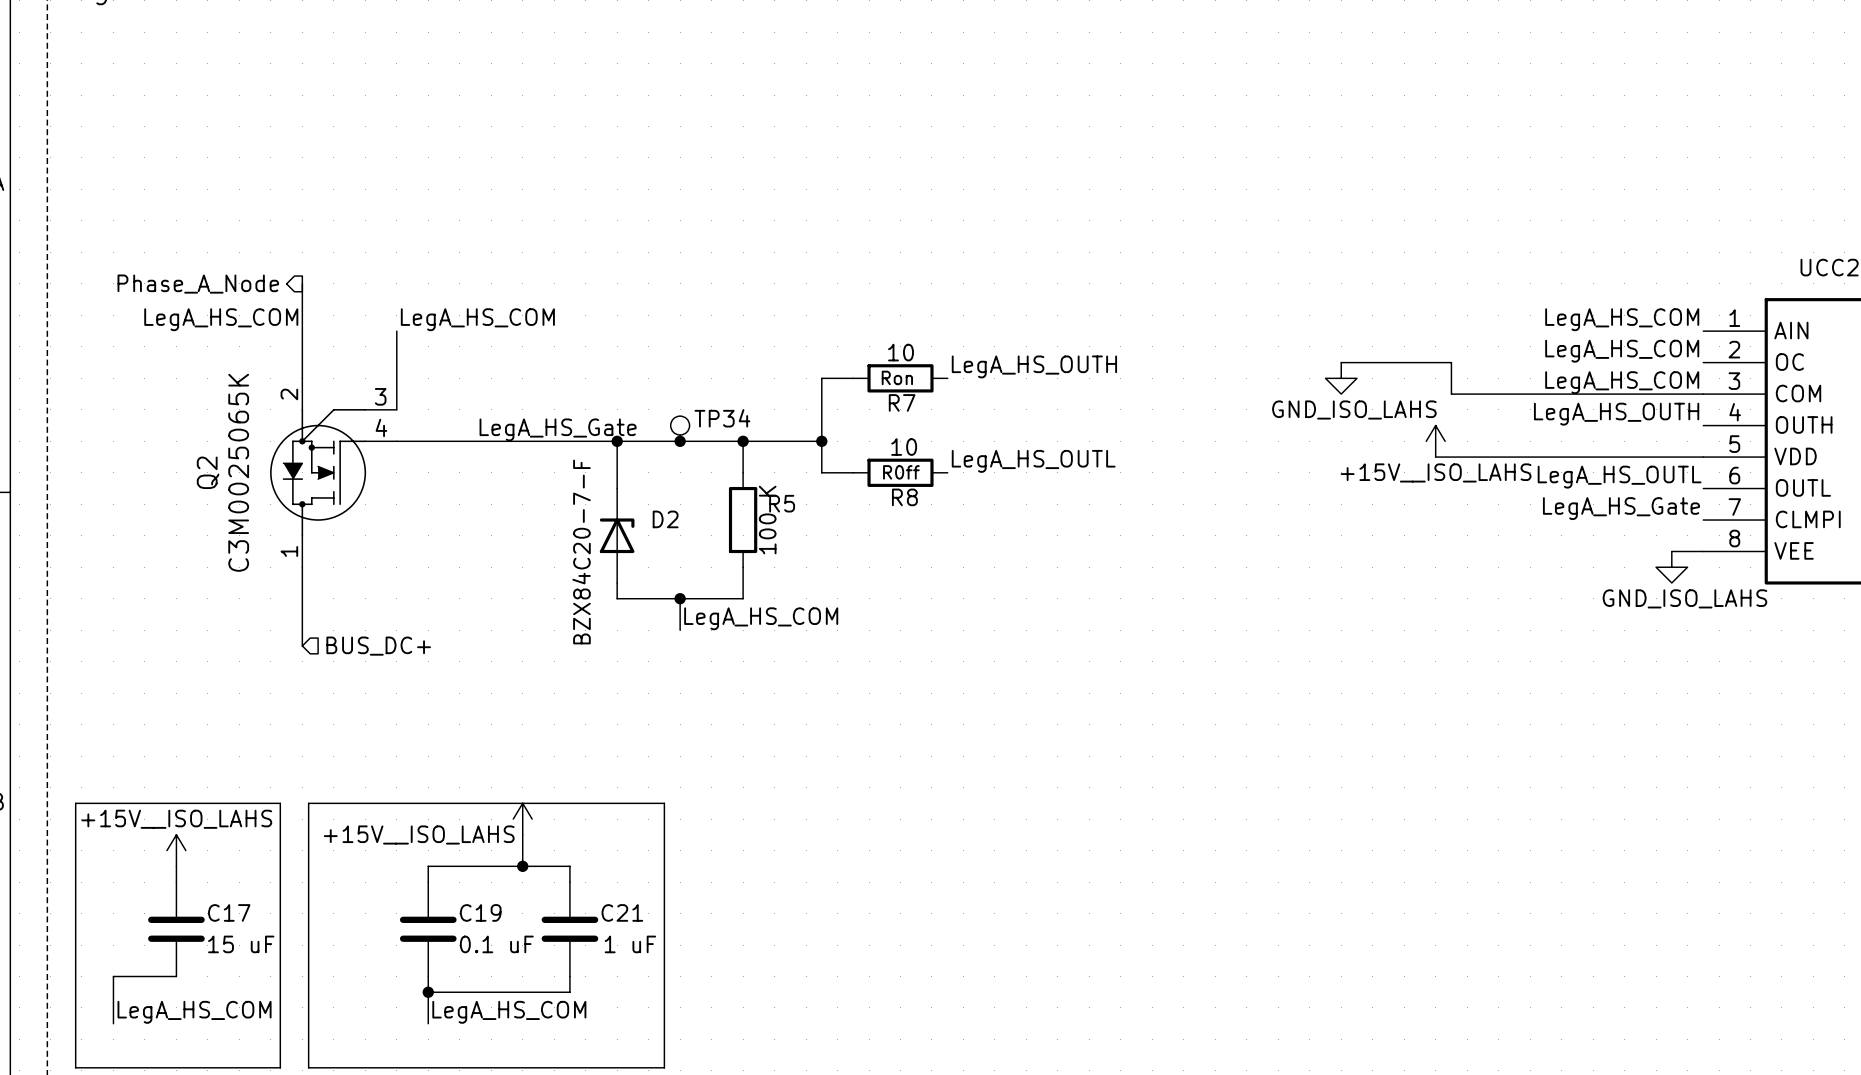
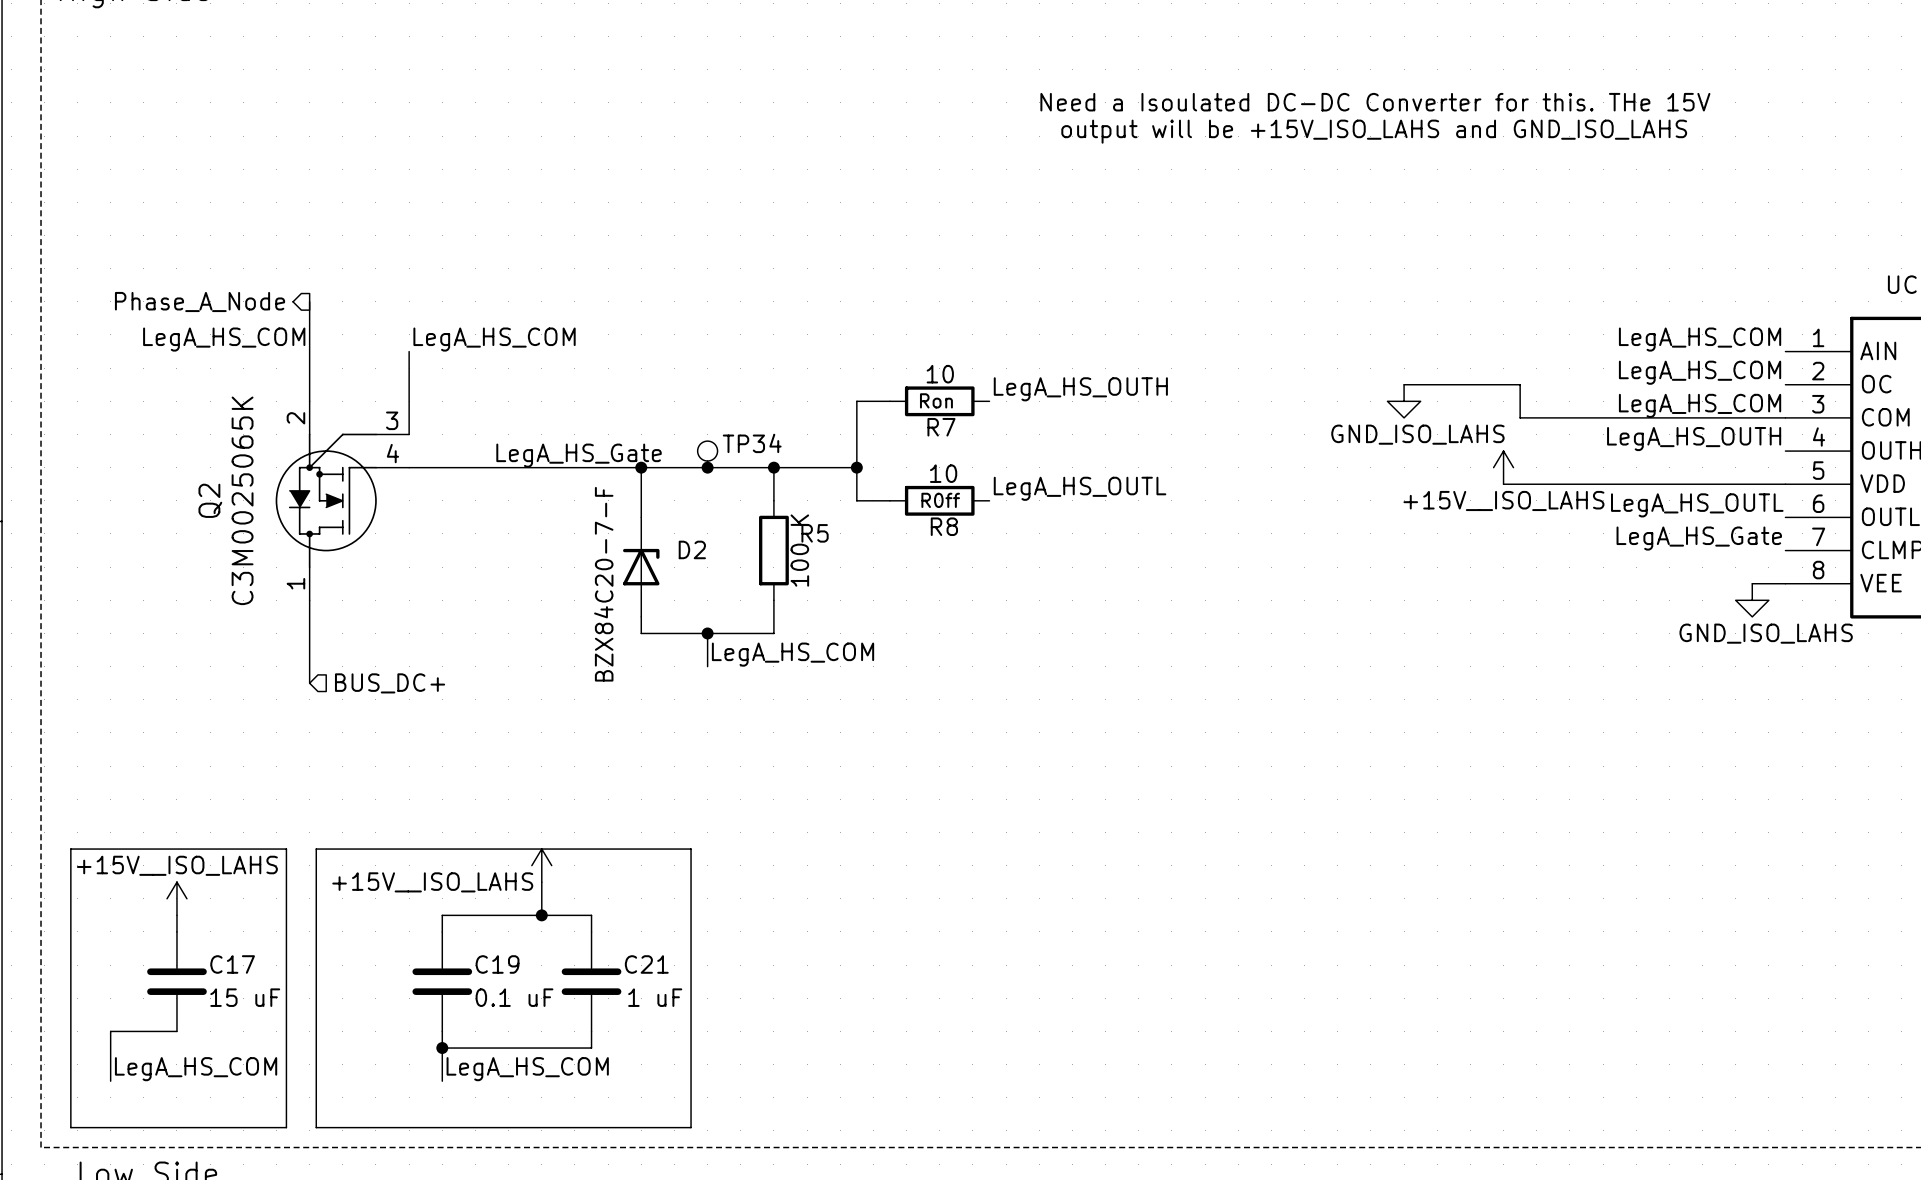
text: none -> Need a Isoulated DC-DC Converter for this. THe 15V (1375, 102)
text: none -> output will be +15V_ISO_LAHS and GND_ISO_LAHS (1374, 131)

